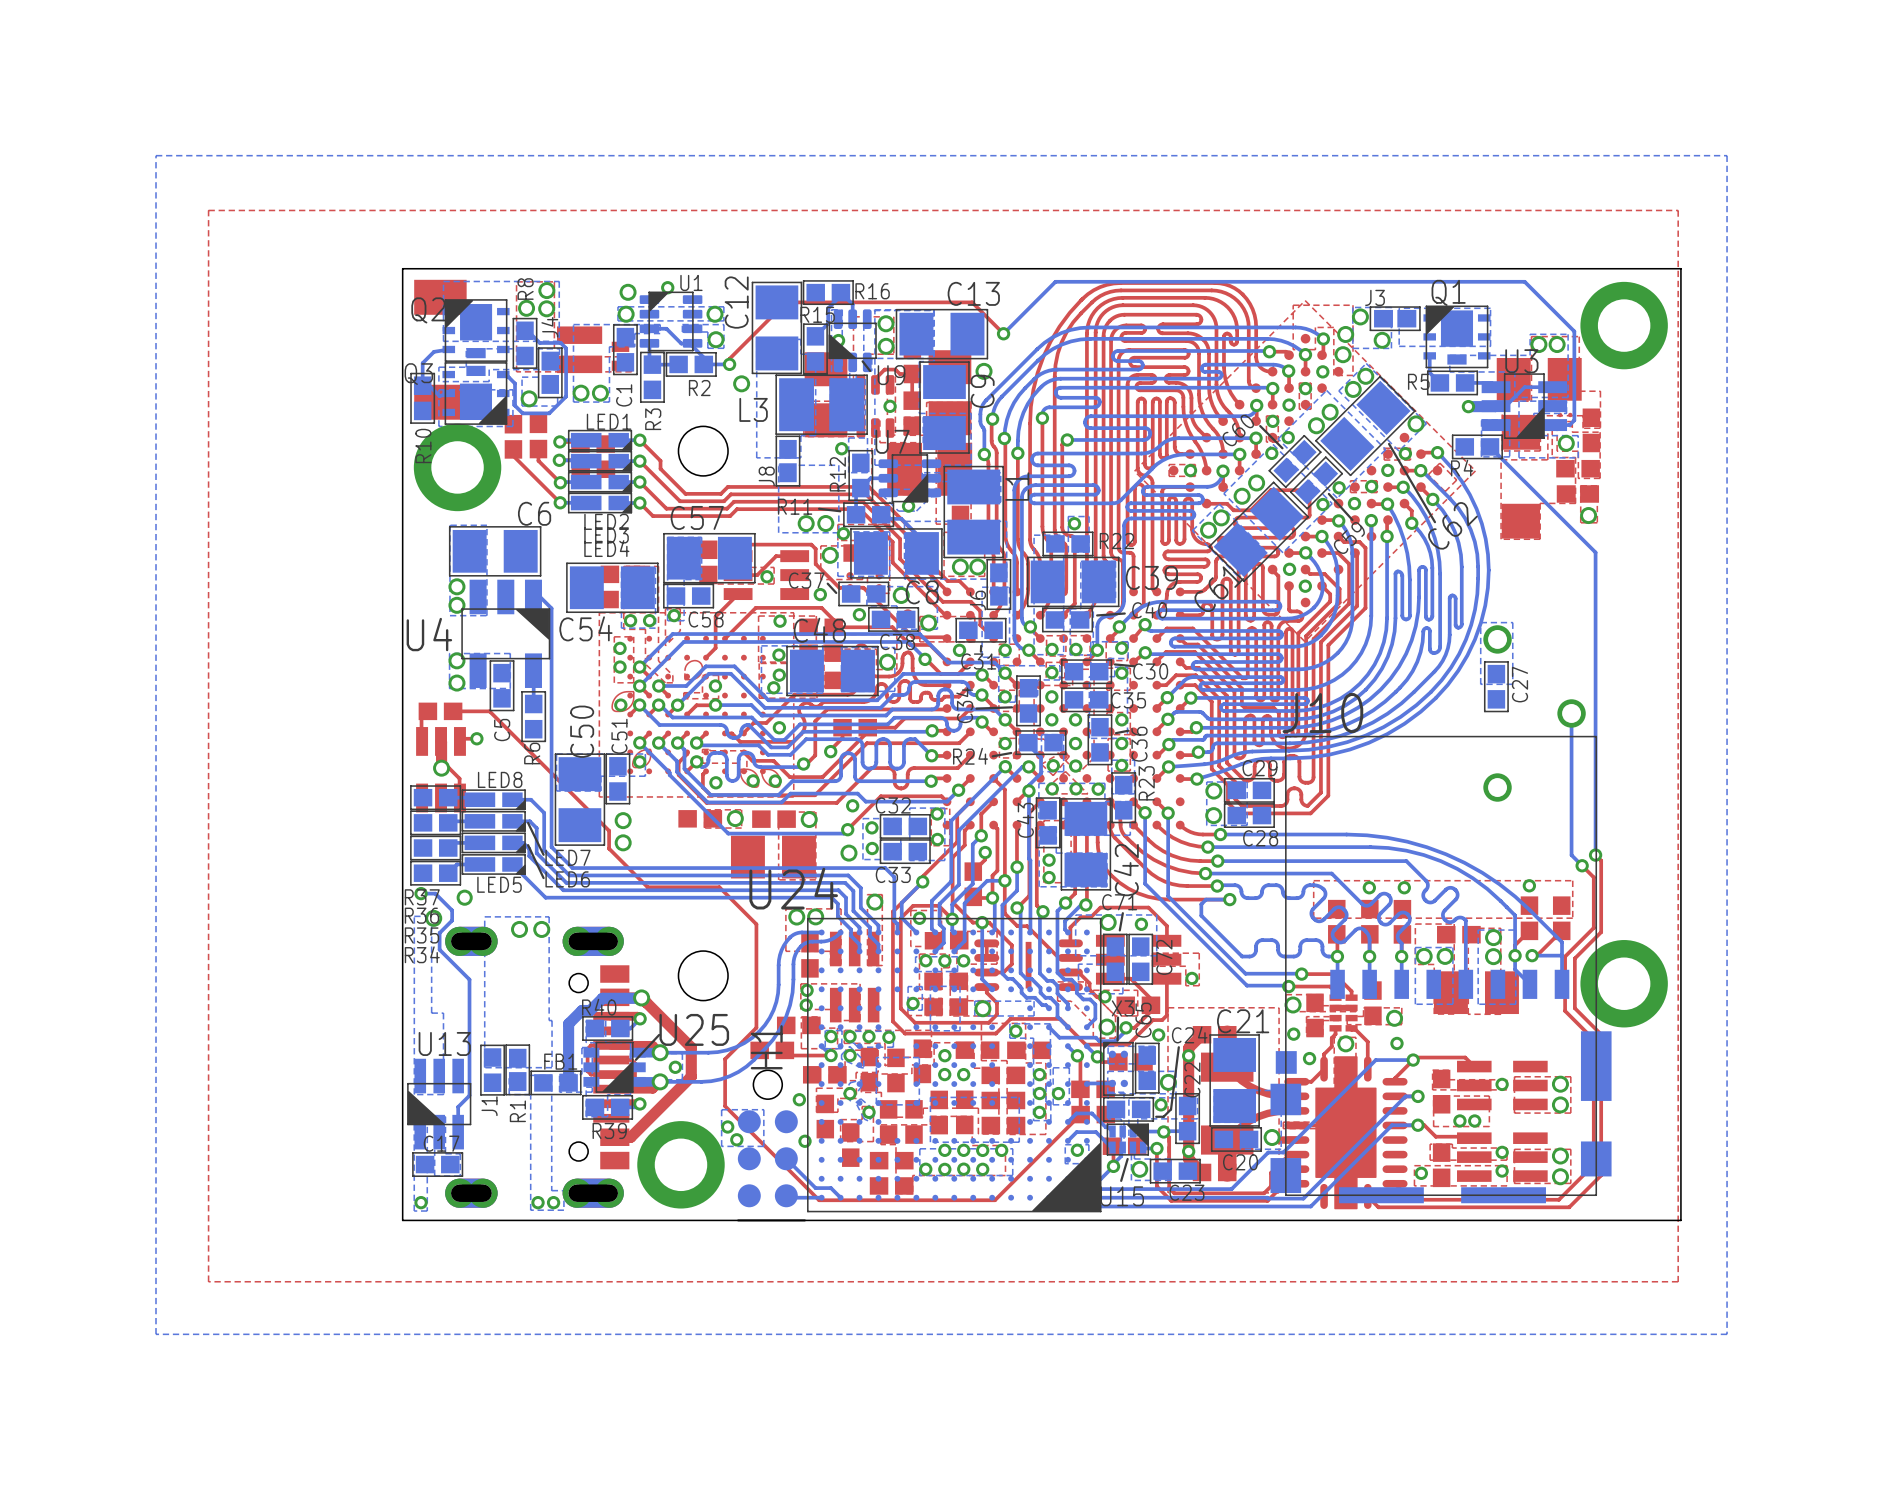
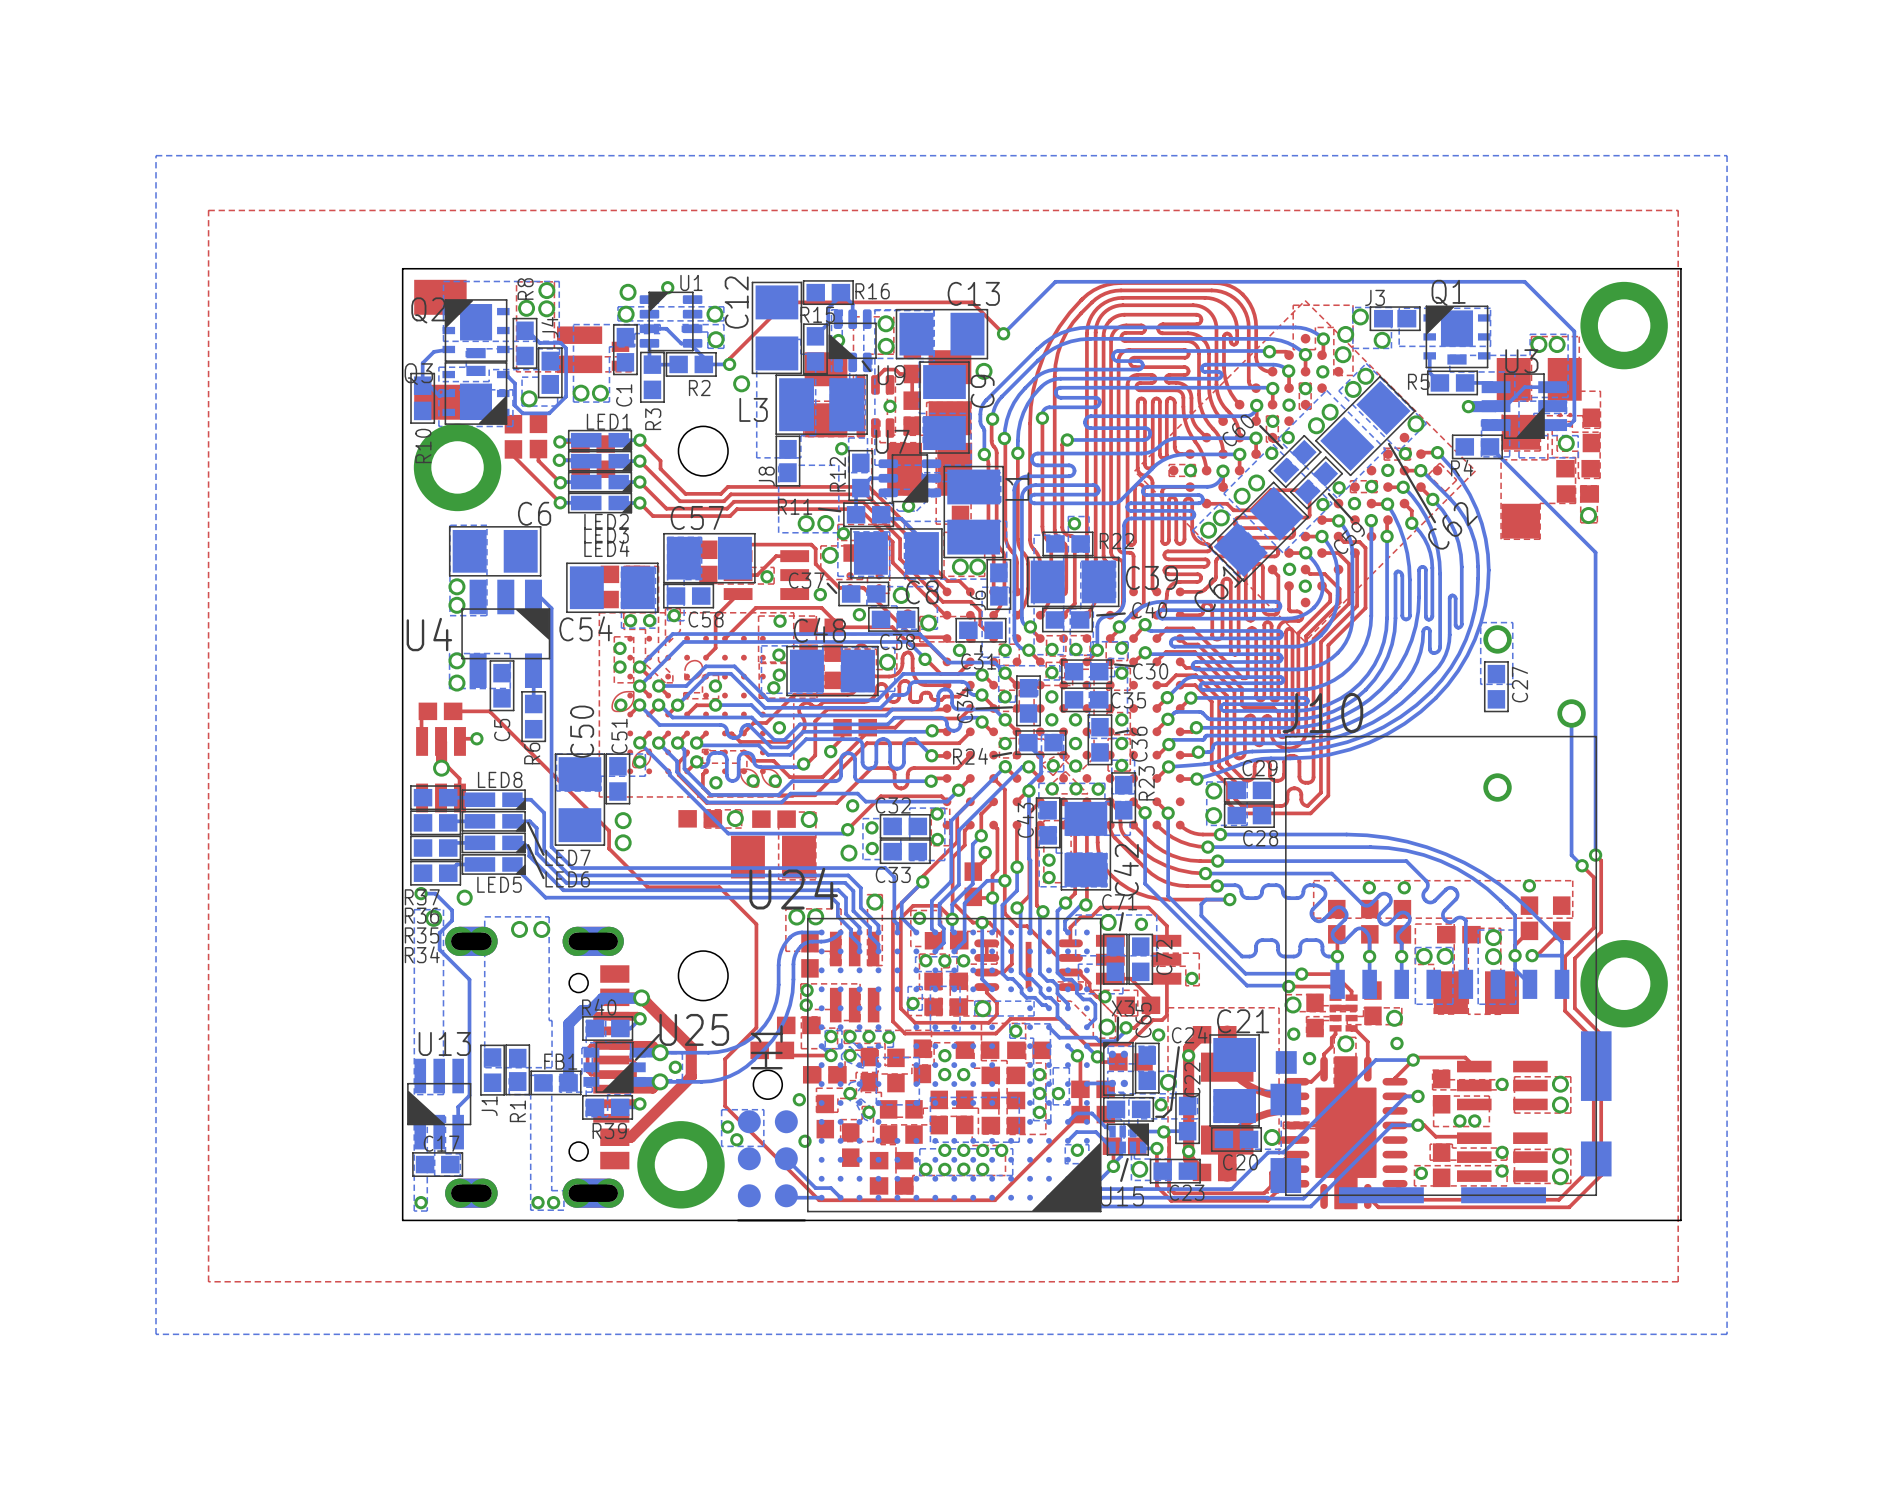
bottom zone outline: (414, 916) (431, 916) (431, 1013) (443, 1013) -> (414, 916) (414, 909) (443, 909) (443, 1013)

